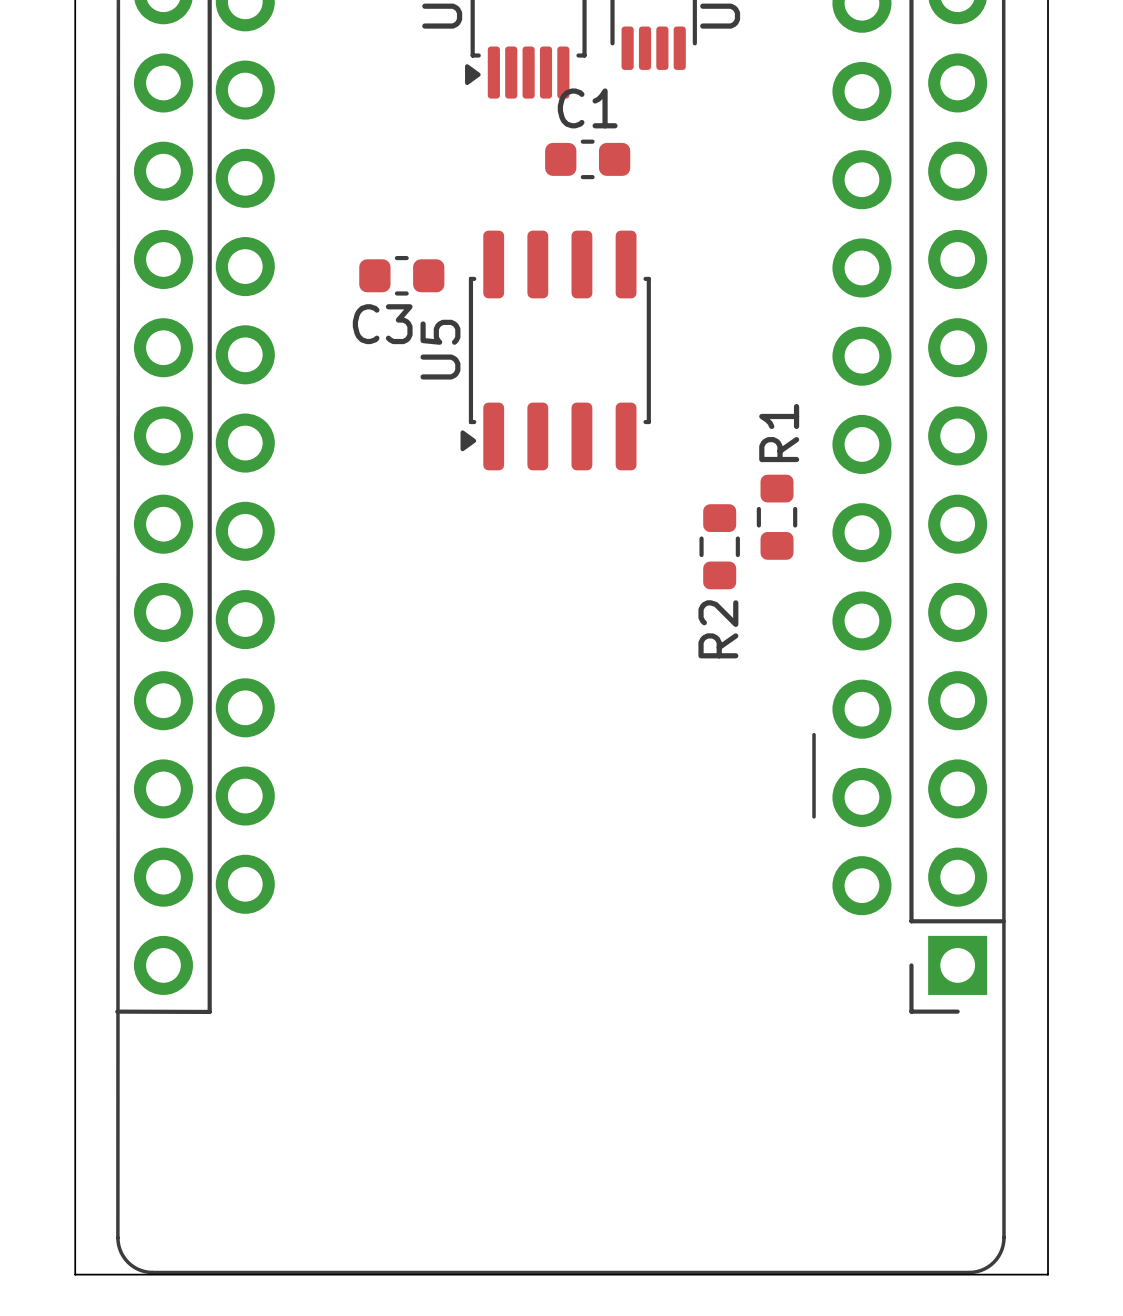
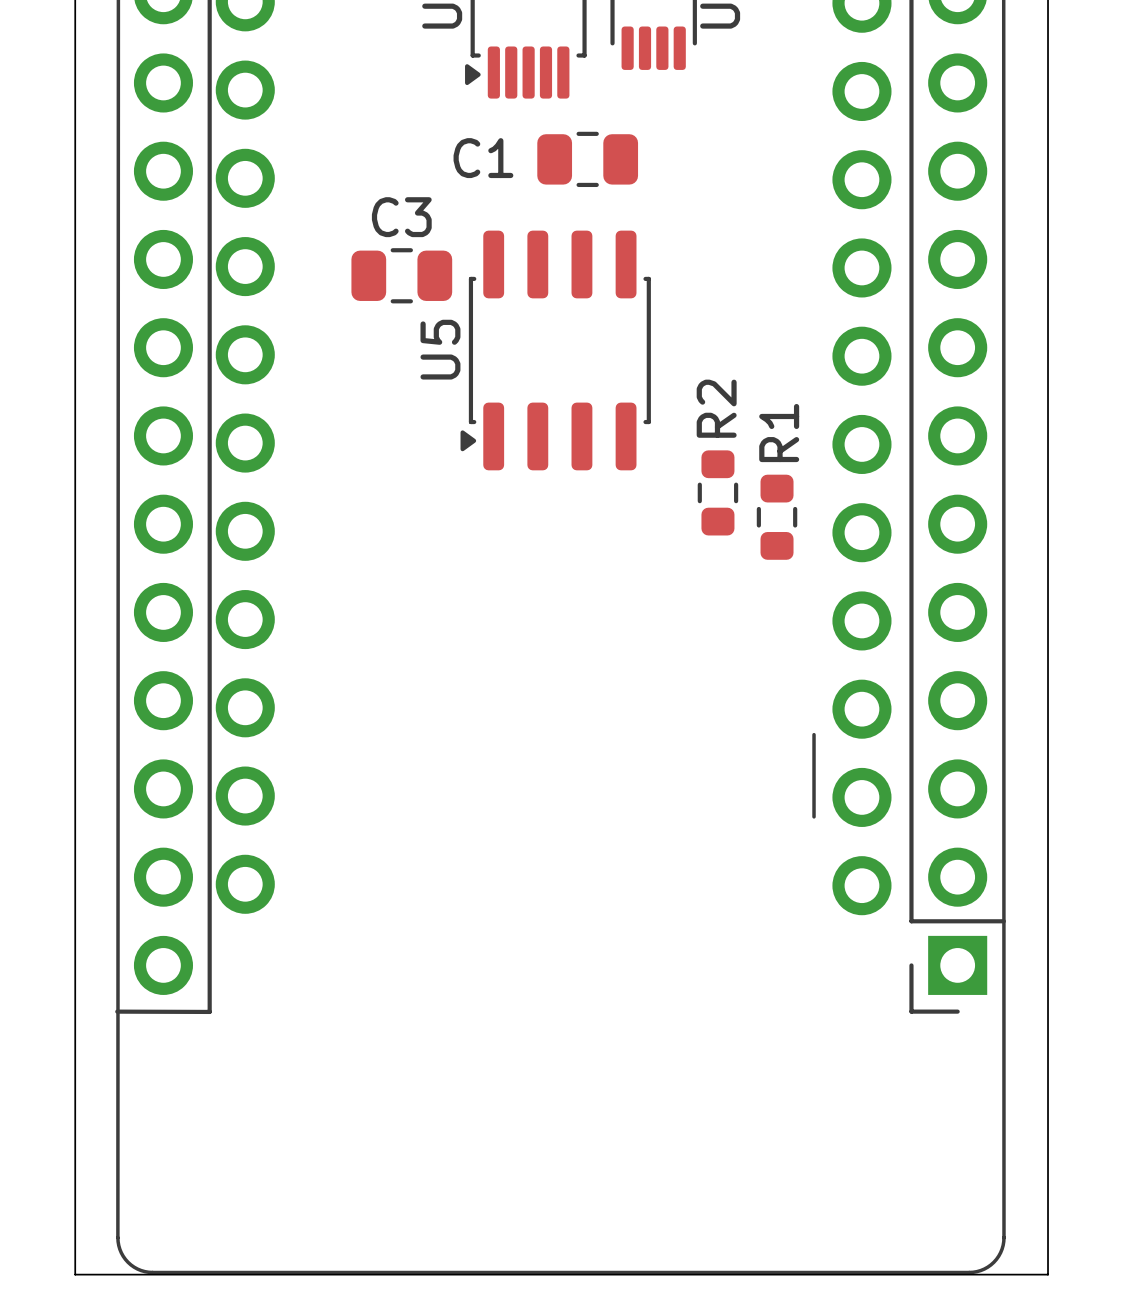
C1 name position: C1 (587, 108) -> C1 (483, 158)
C1 footprint: [545, 139, 631, 180] -> [537, 131, 639, 188]
C3 footprint: [359, 255, 445, 296] -> [351, 248, 453, 304]
C3 name position: C3 (382, 324) -> C3 (401, 217)
R2 position: (719, 546) -> (717, 492)
R2 name position: R2 (718, 629) -> R2 (716, 408)

